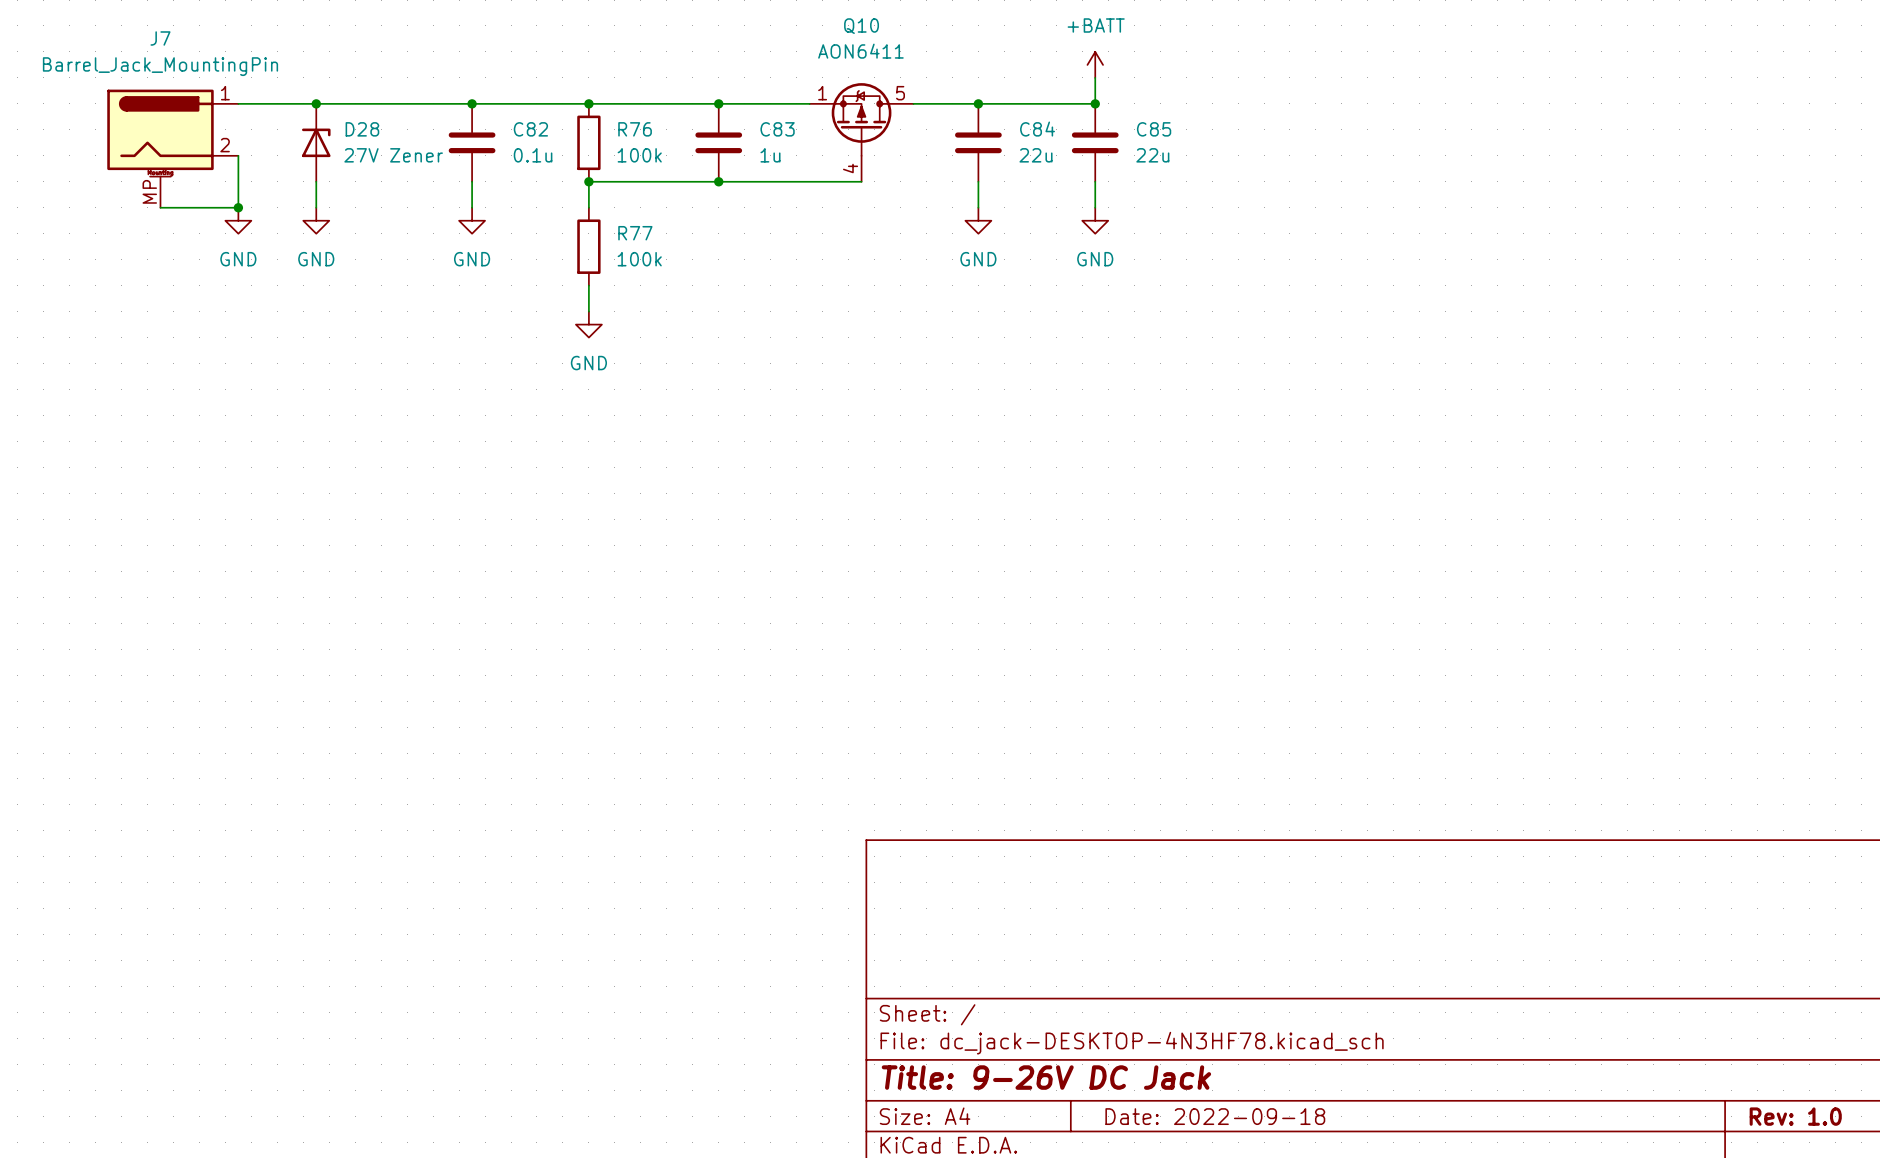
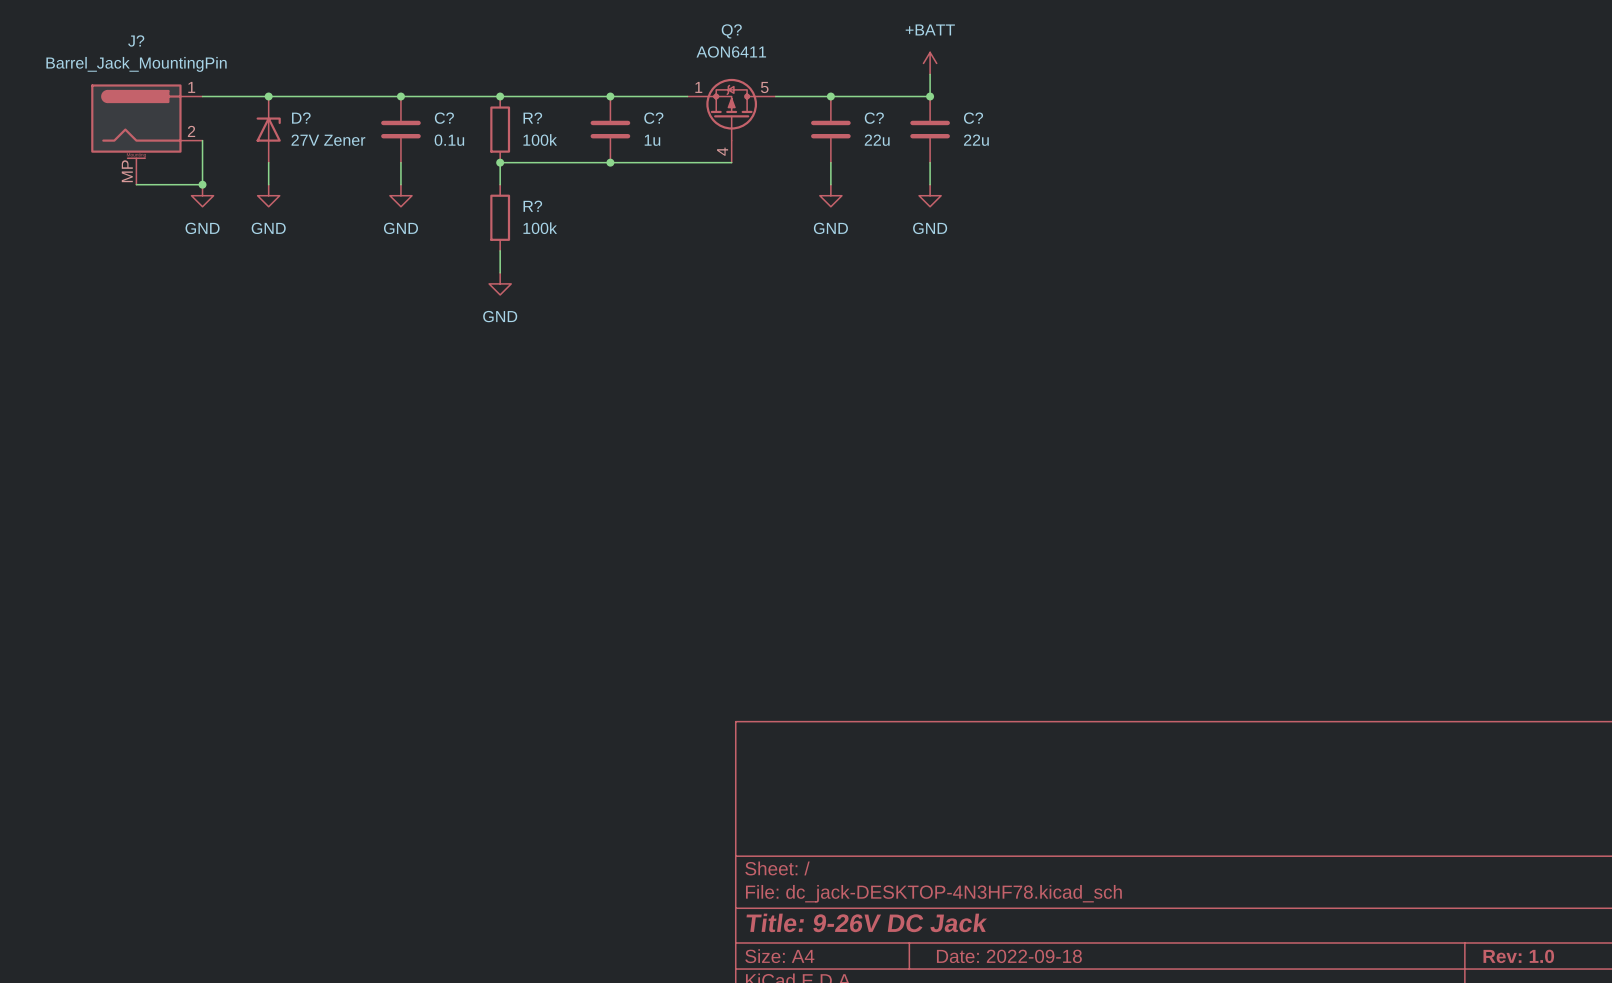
Q10 name: Q10 (861, 26) -> Q? (731, 31)
J7 name: J7 (160, 38) -> J? (136, 40)
D28 name: D28 (362, 129) -> D? (301, 118)
C82 name: C82 (530, 129) -> C? (444, 118)
R76 name: R76 (635, 129) -> R? (532, 118)
C83 name: C83 (777, 129) -> C? (653, 118)
C84 name: C84 (1037, 129) -> C? (874, 118)
C85 name: C85 (1154, 129) -> C? (973, 118)
R77 name: R77 (635, 233) -> R? (532, 206)

